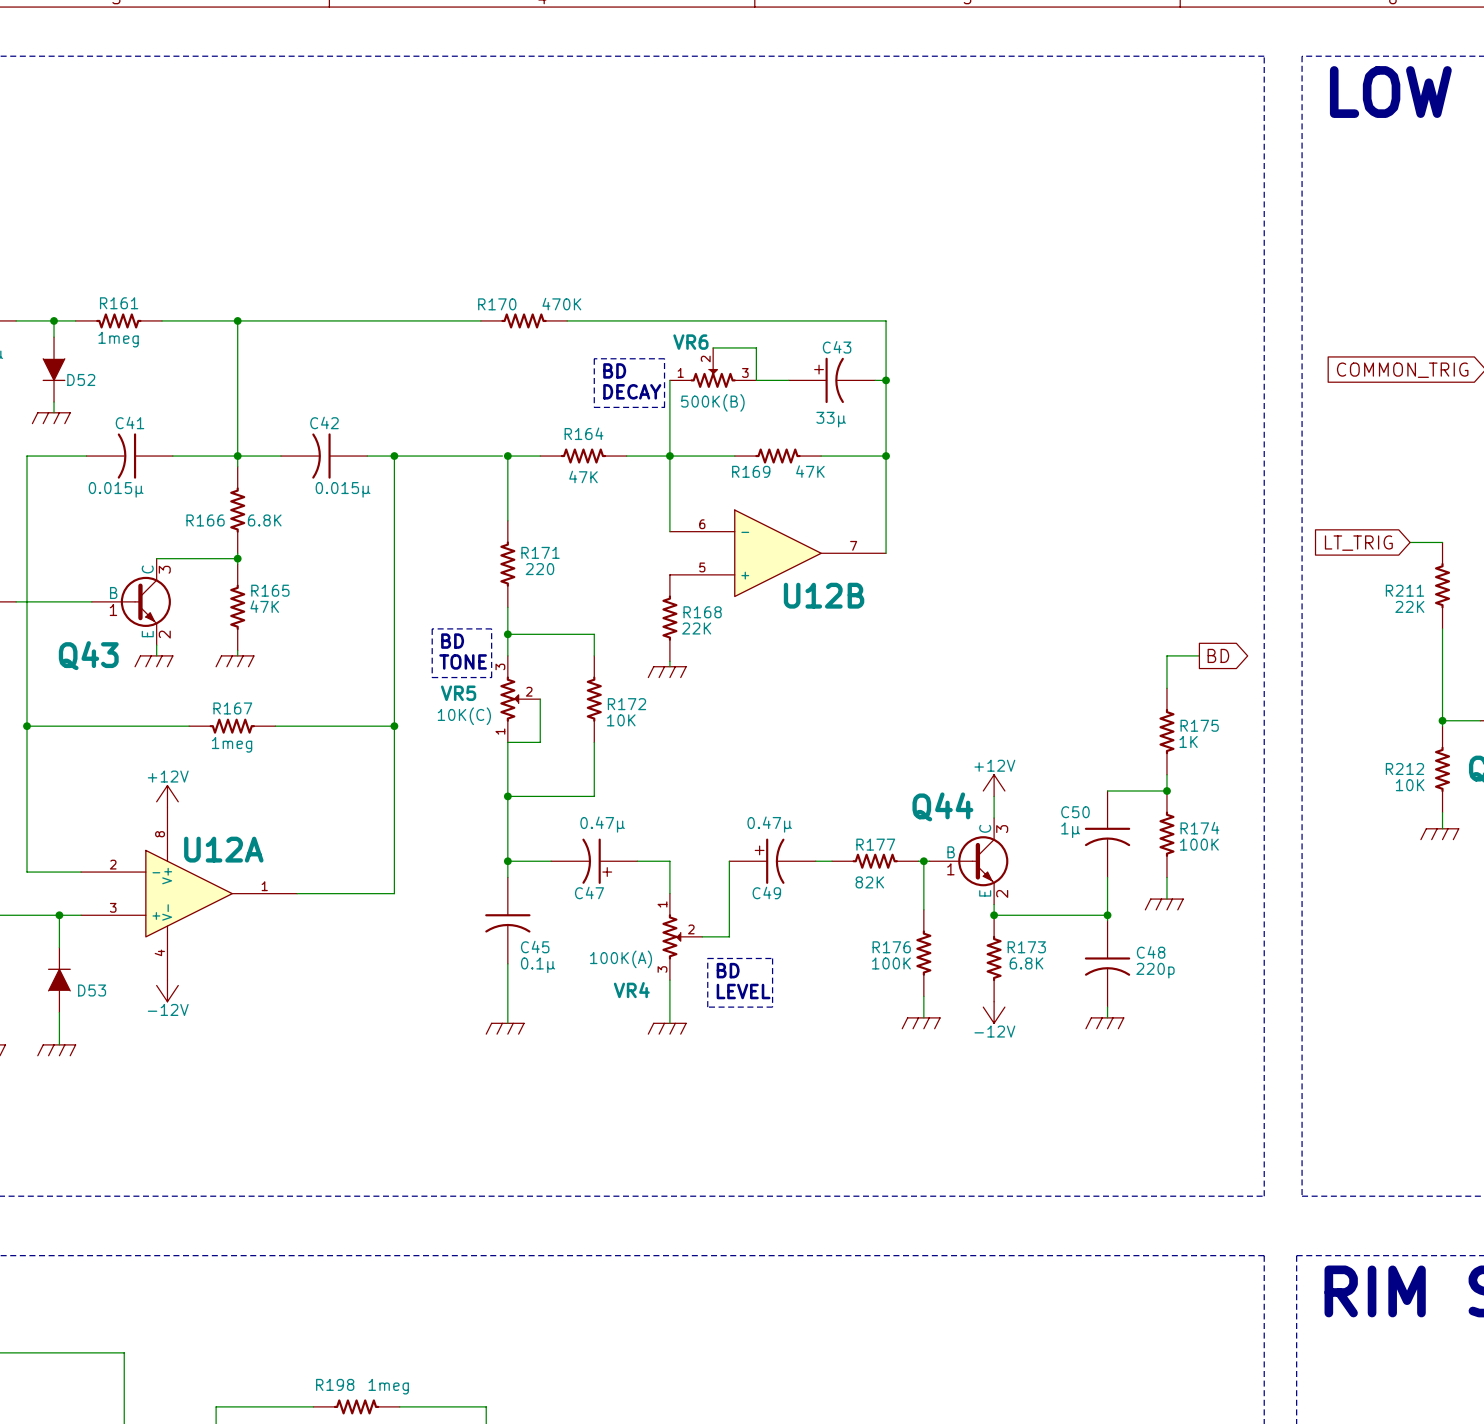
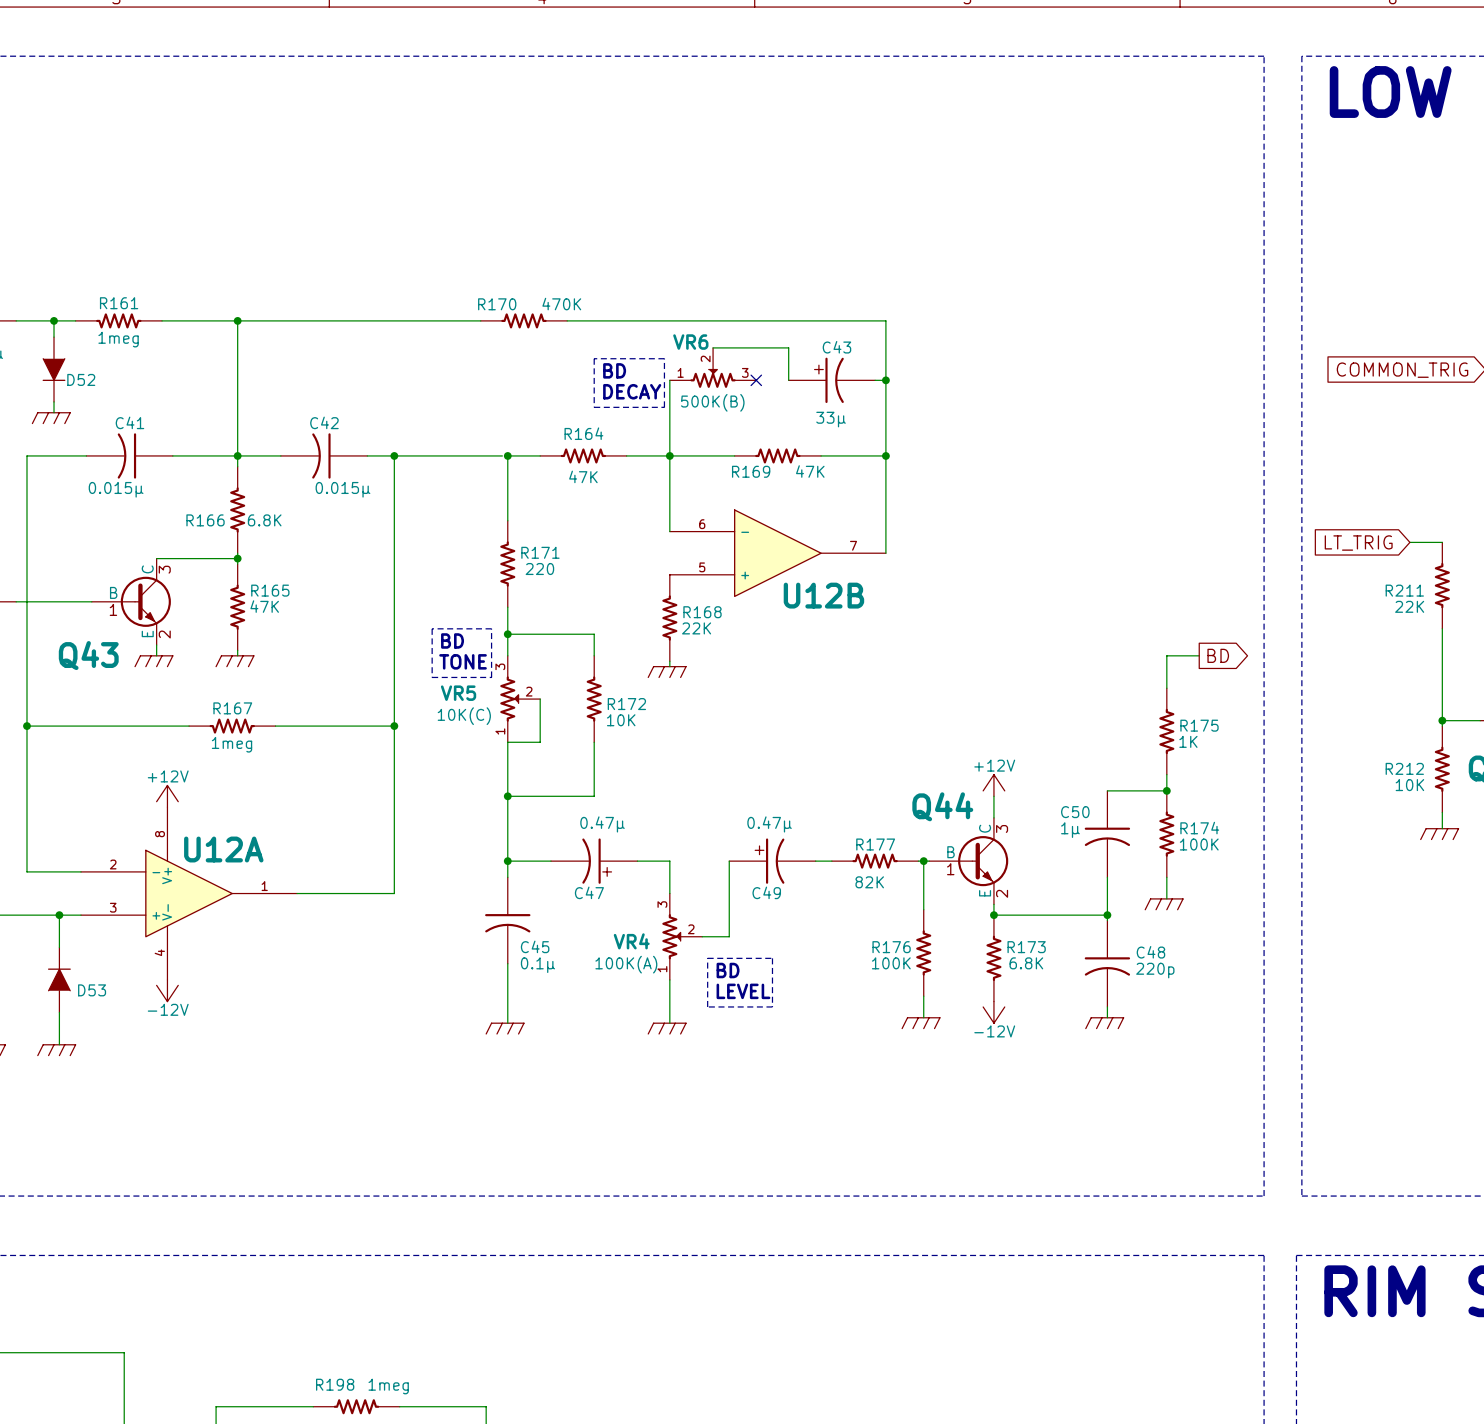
wire: (756, 347) (756, 380) (788, 380) -> (756, 347) (788, 347) (788, 380)
no-connect mark: none -> (756, 380)
VR4 flip: as is (671, 936) -> up-down (671, 936)
VR4 name position: VR4 (631, 990) -> VR4 (631, 941)

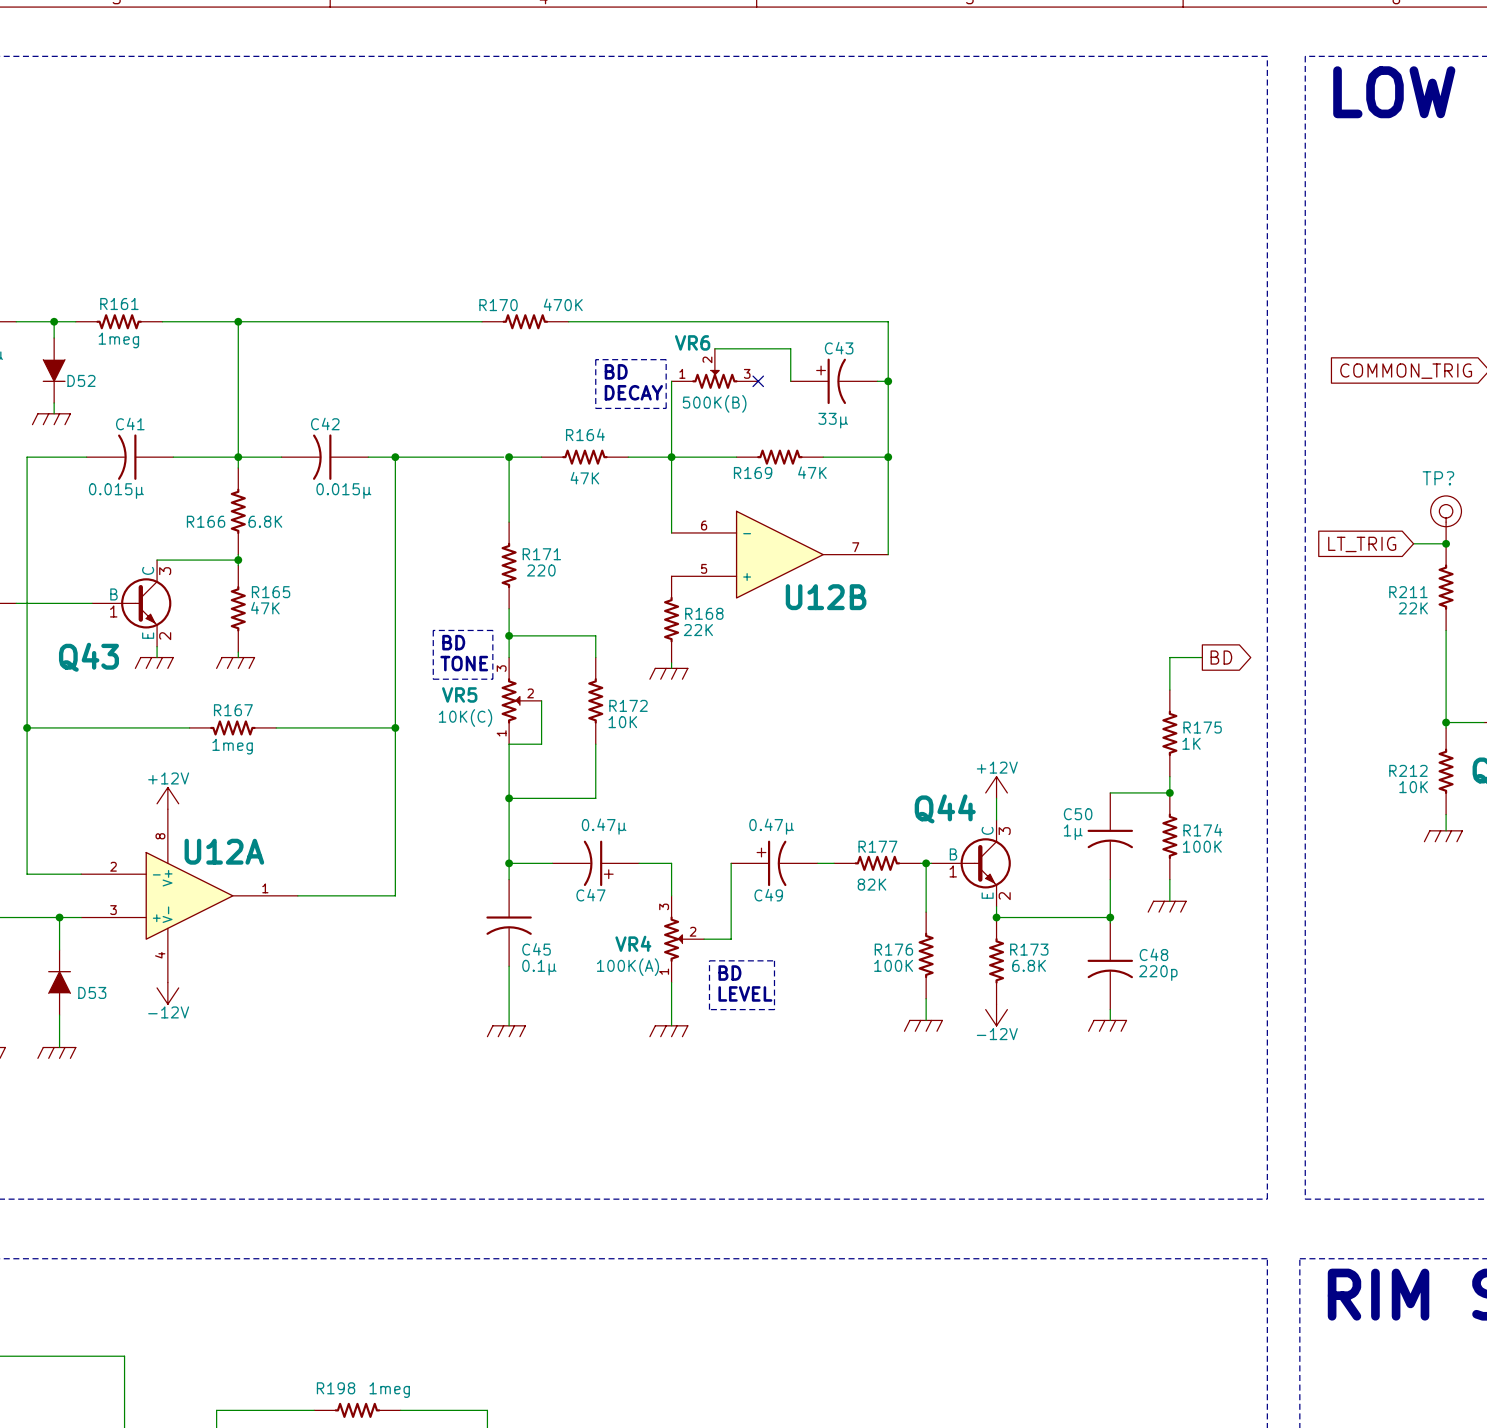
TP?: none -> (1446, 519)
junction: none -> (1446, 543)

